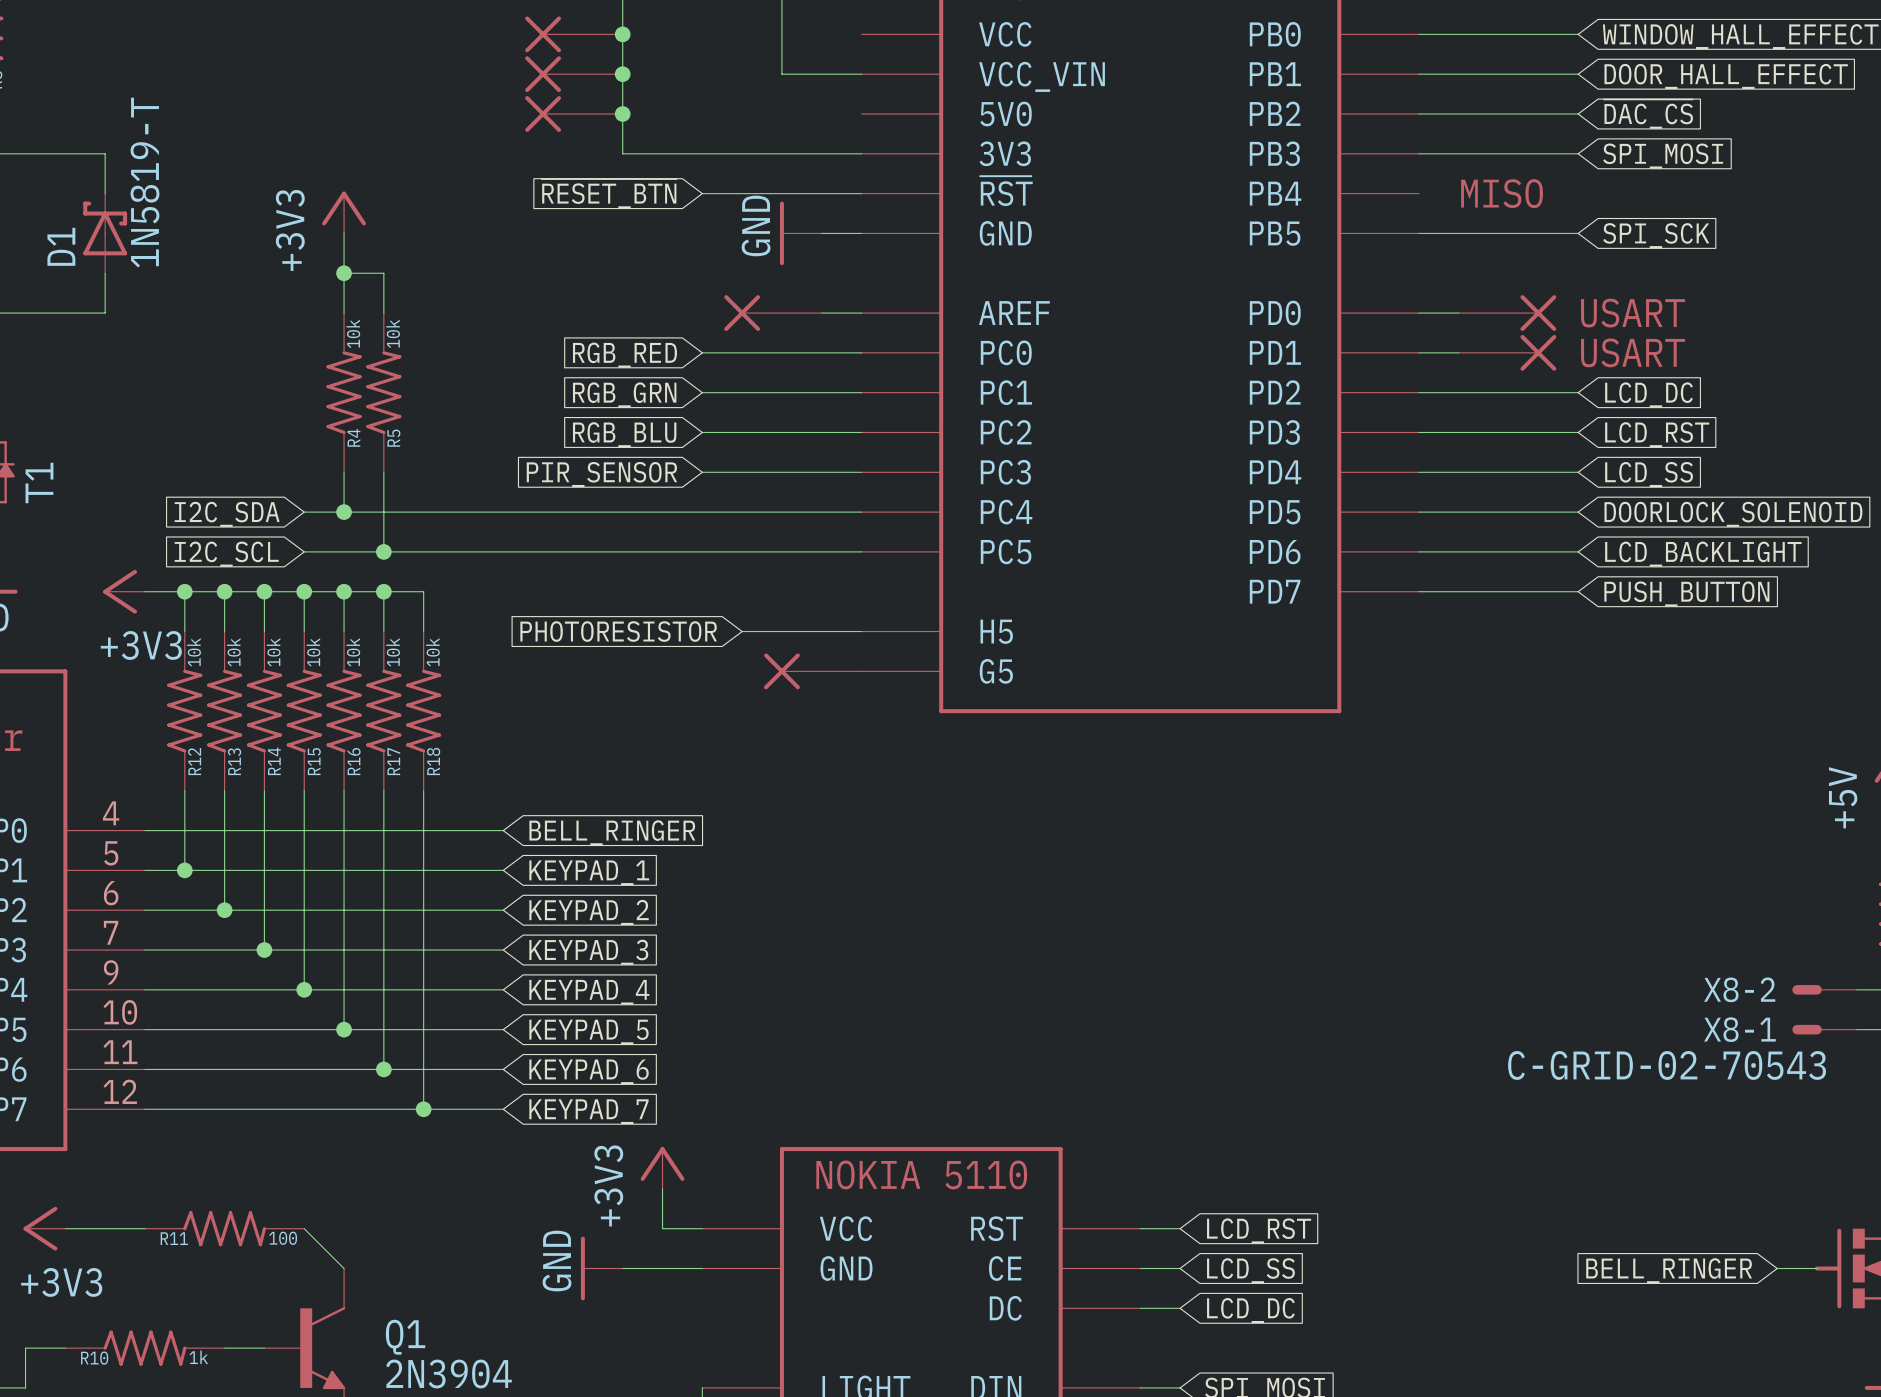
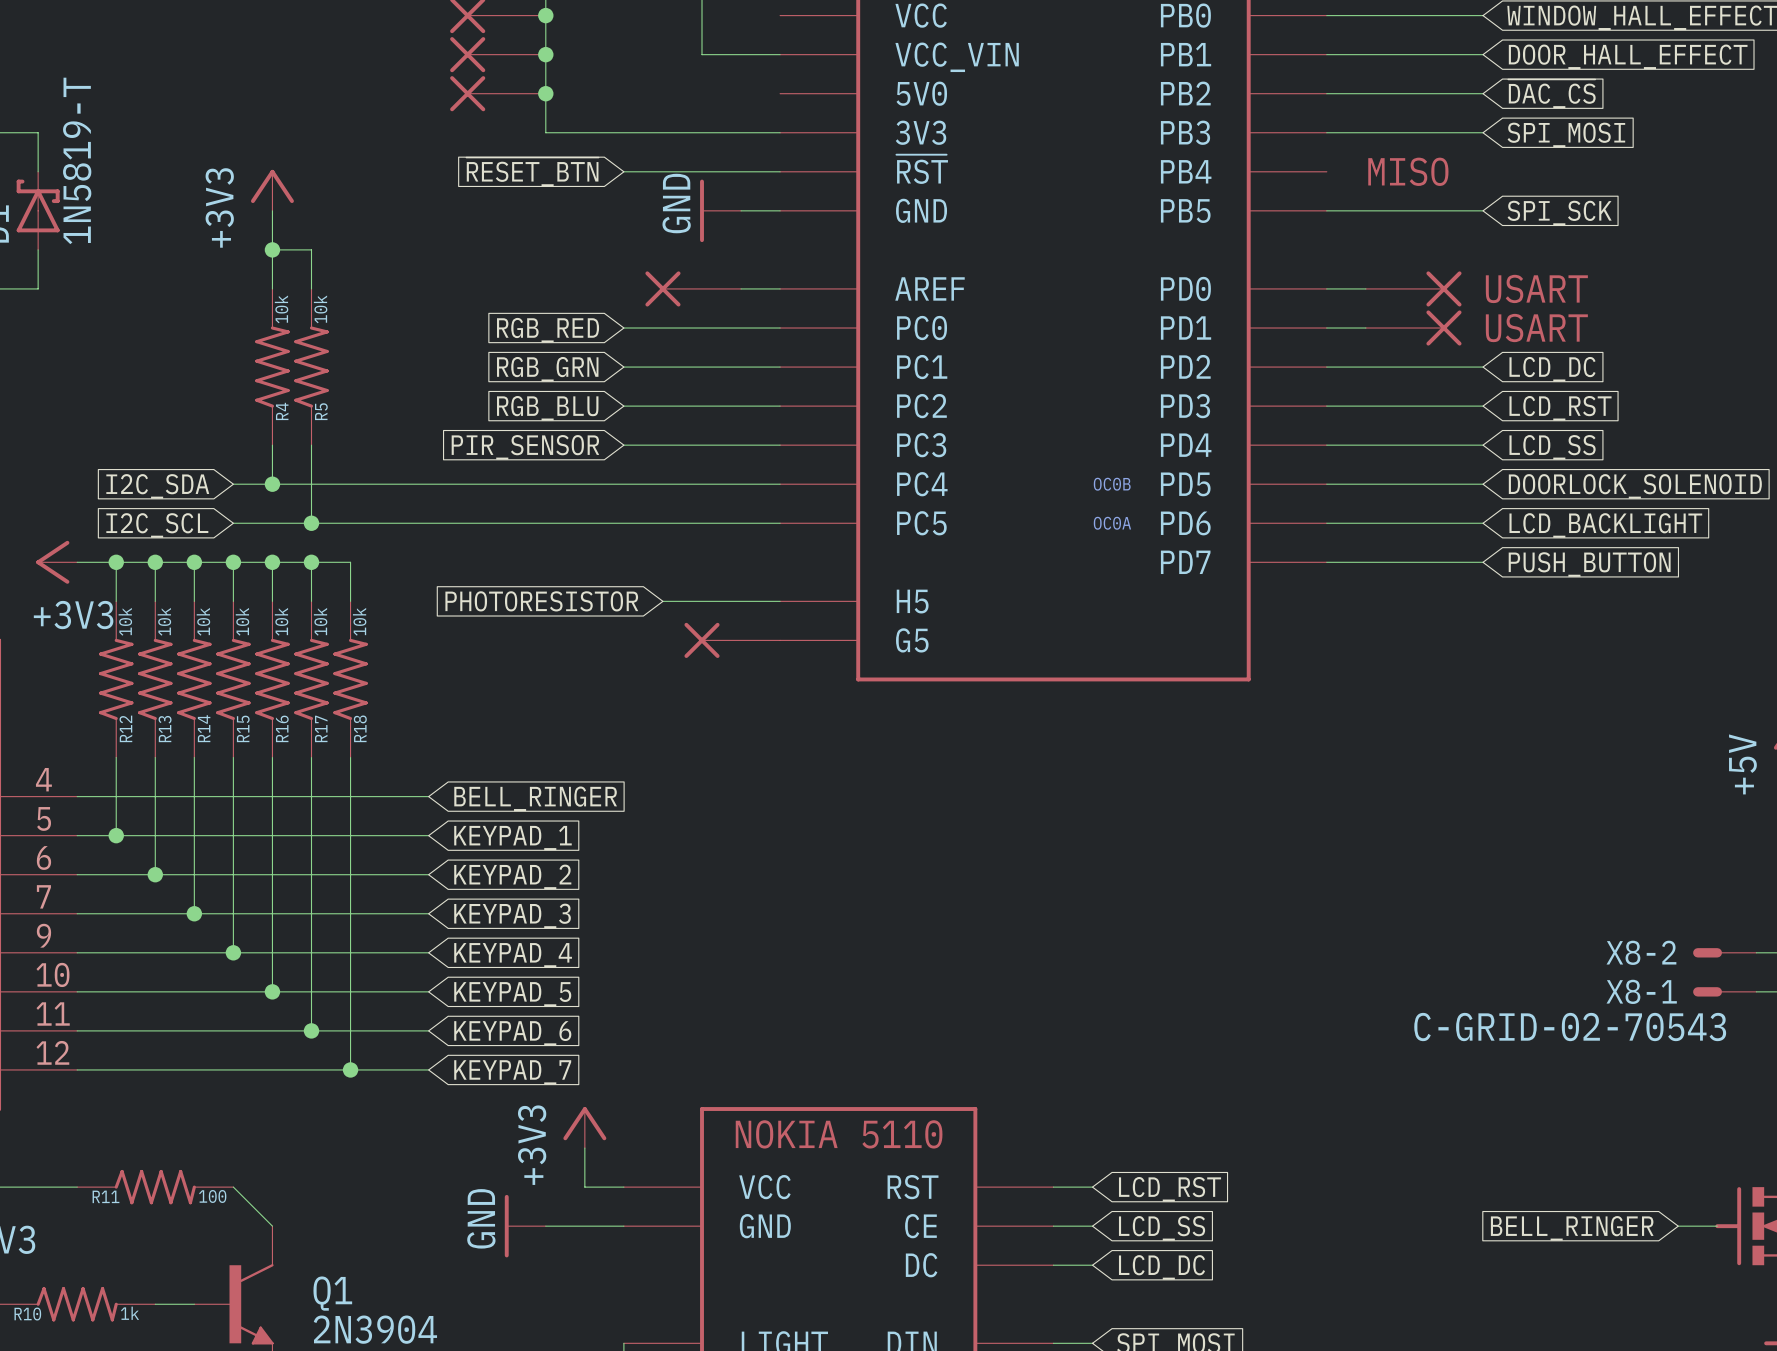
text: none -> OC0B (1112, 484)
text: none -> OC0A (1112, 523)

